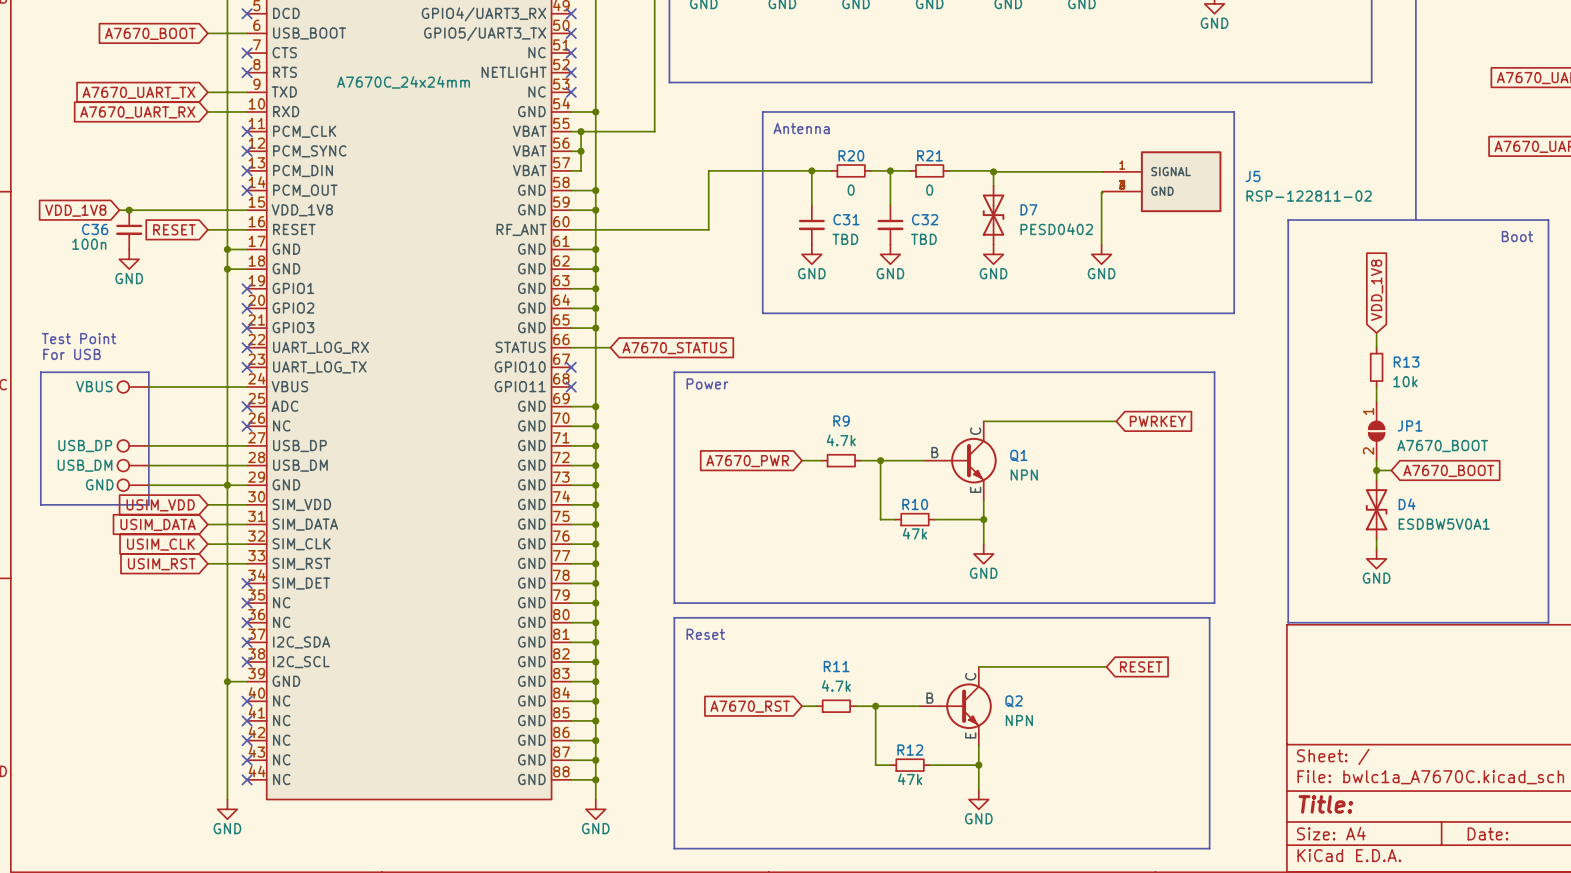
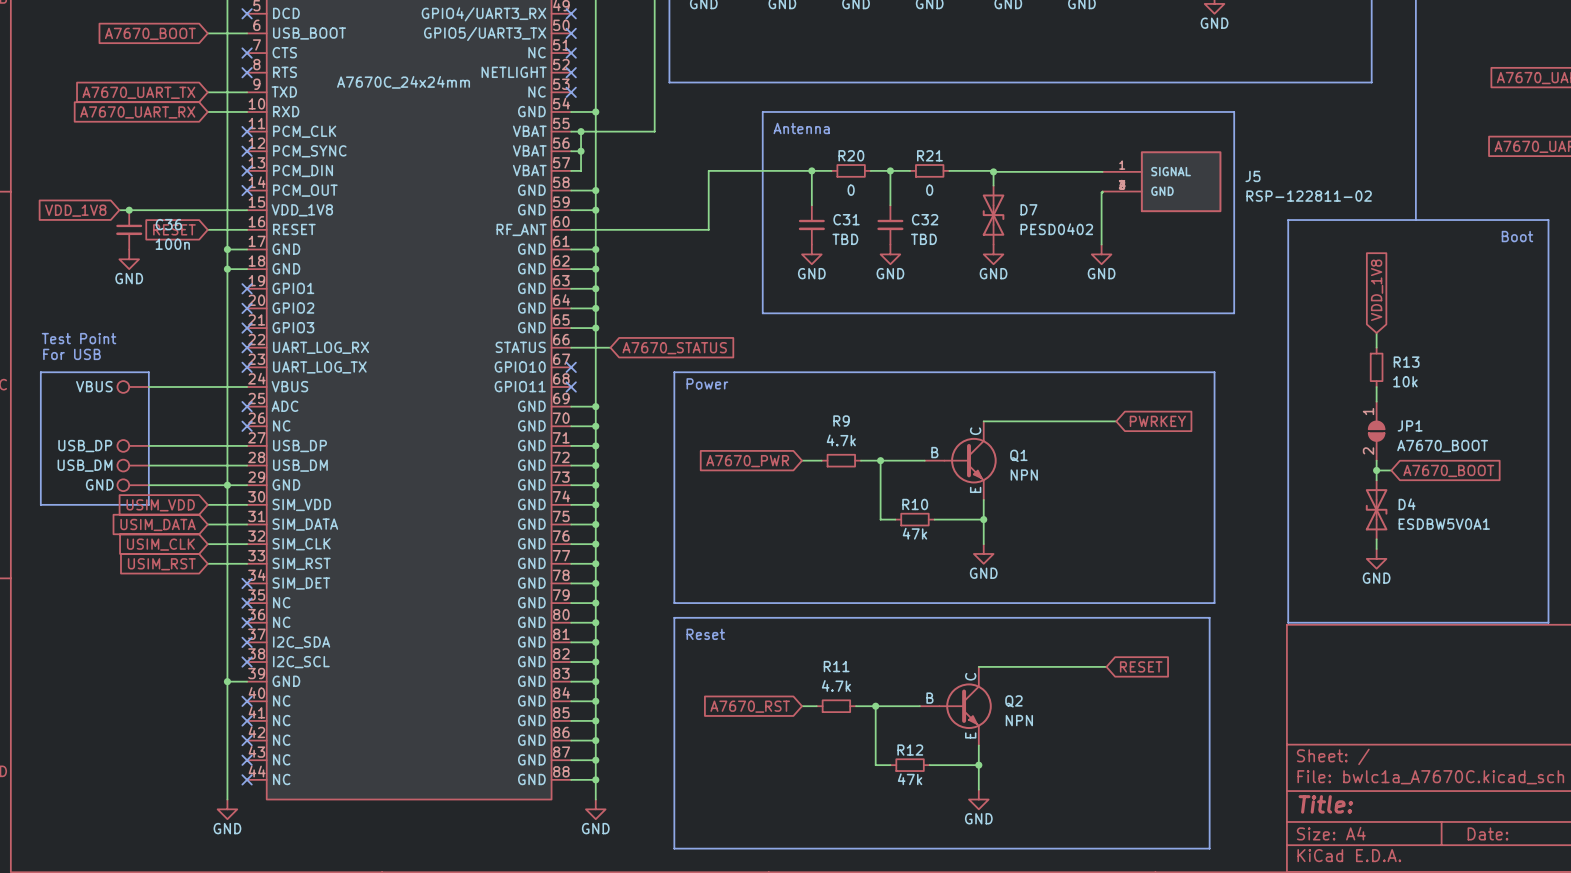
C36 name position: C36 (95, 229) -> C36 (168, 224)
C36 value position: 100n (89, 244) -> 100n (172, 244)

